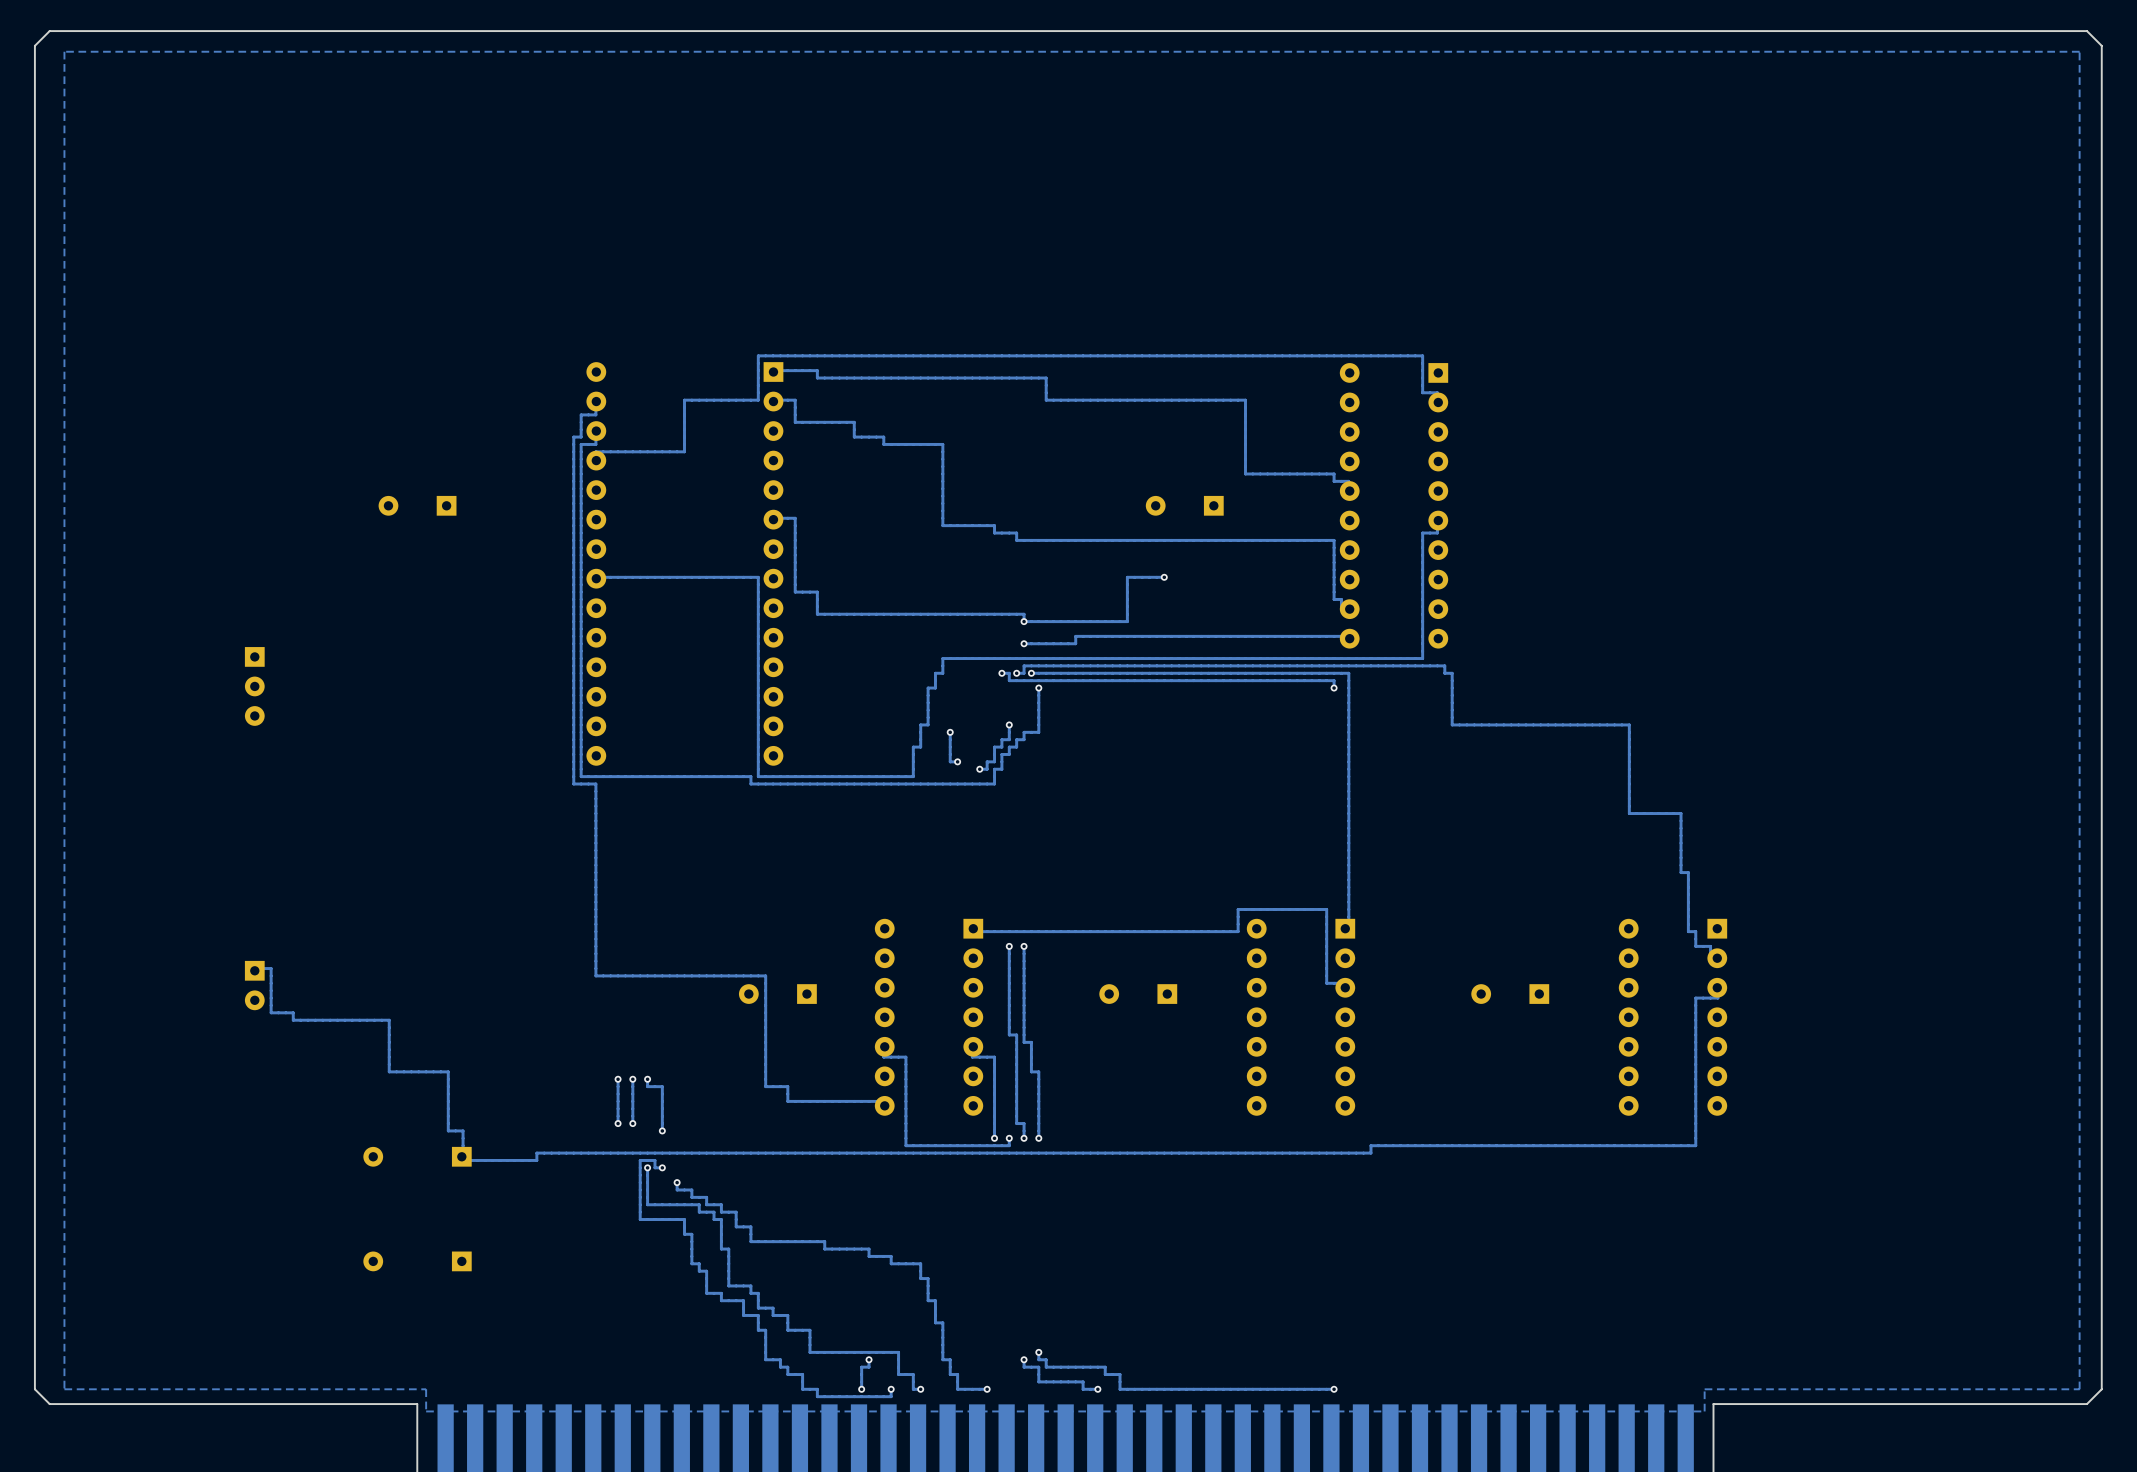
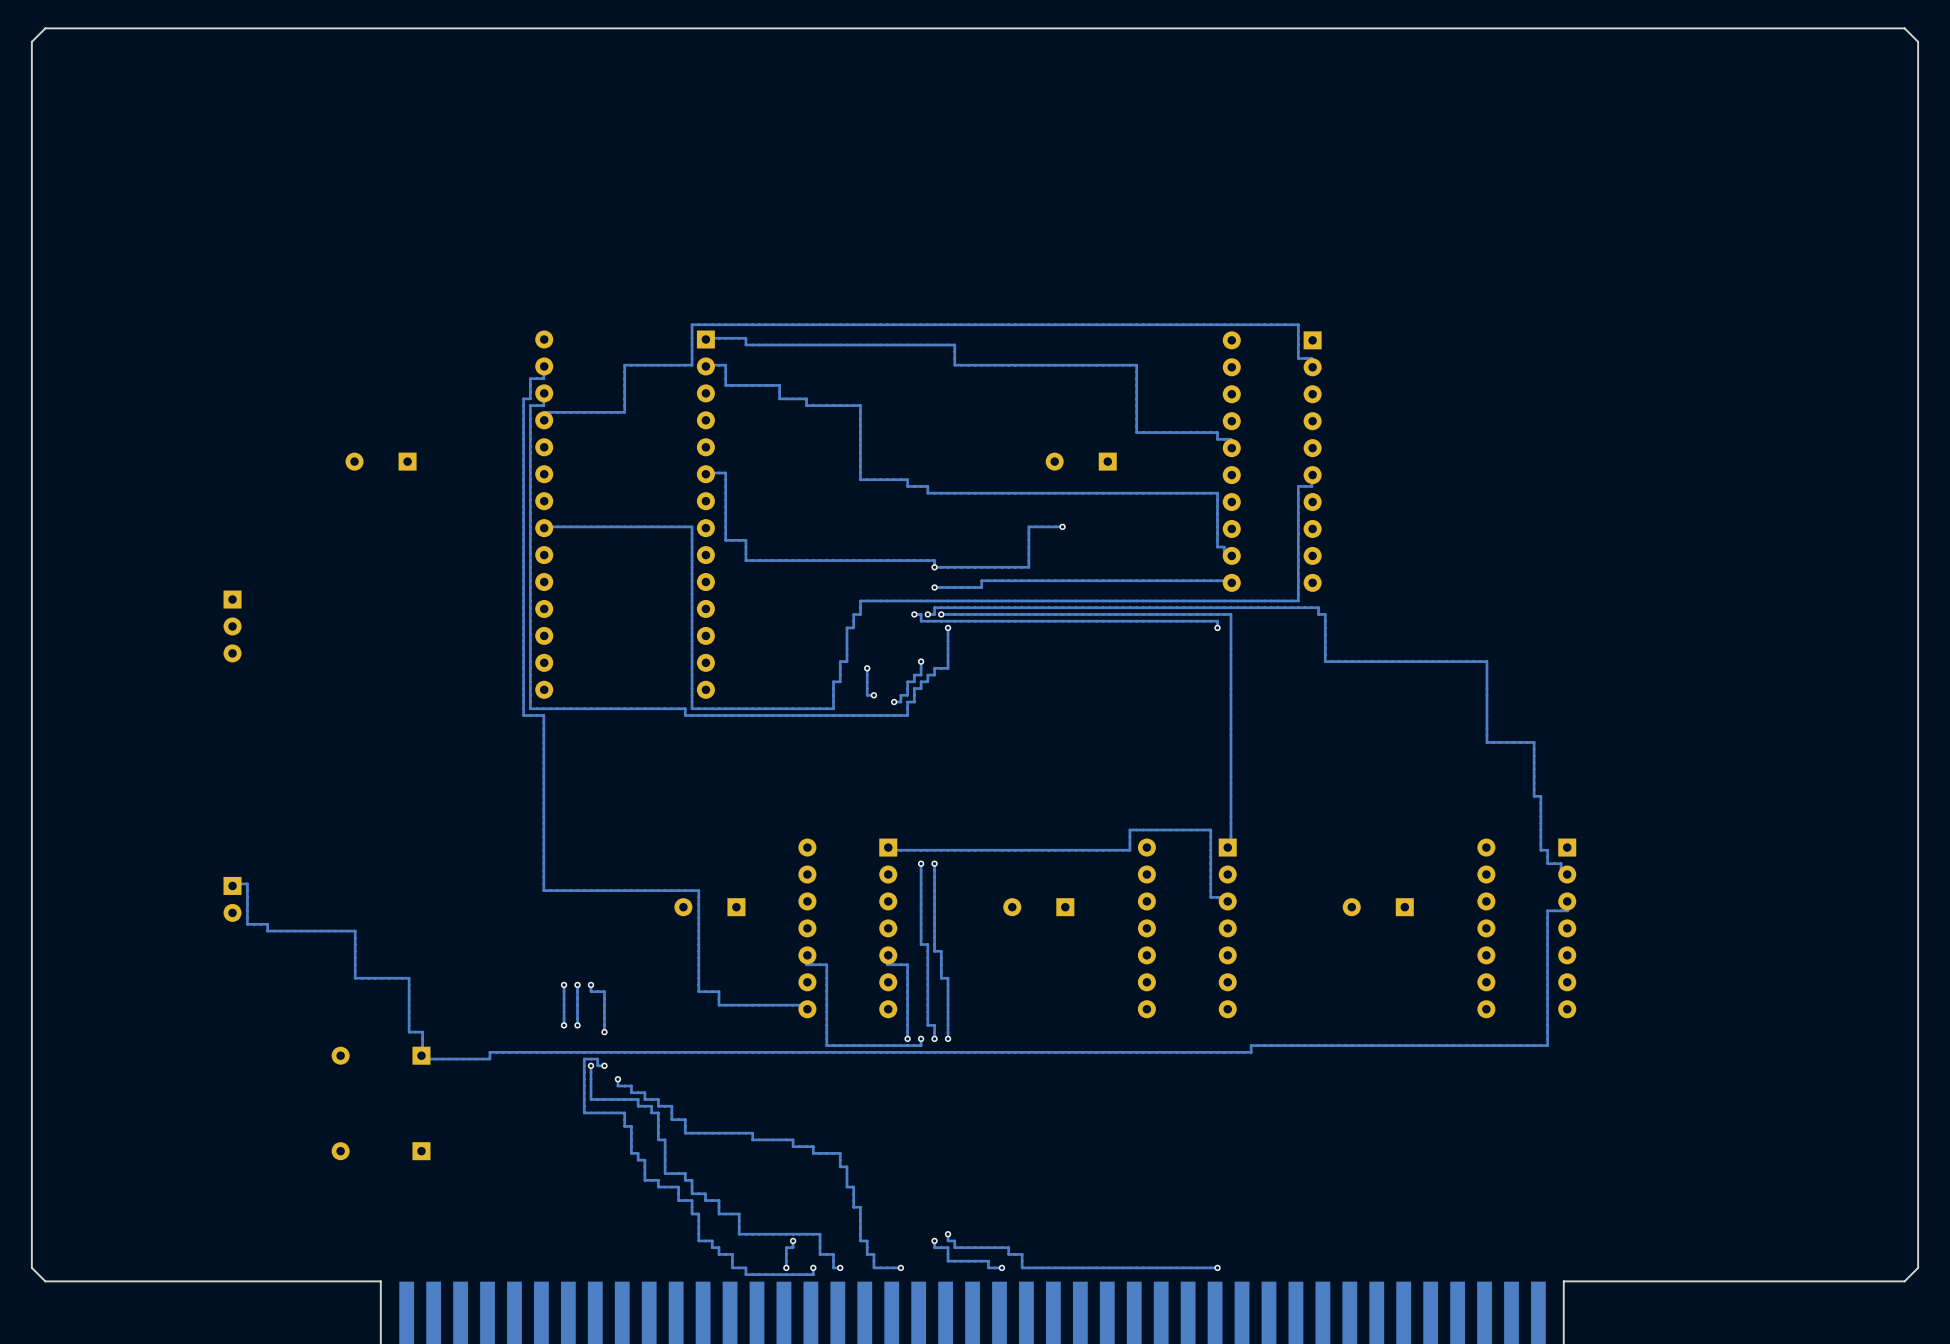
zone outline: (2079, 51) (64, 51) (64, 1389) (426, 1389) (426, 1411) (1704, 1411) (1704, 1389) (2079, 1389) (2079, 51) -> none

